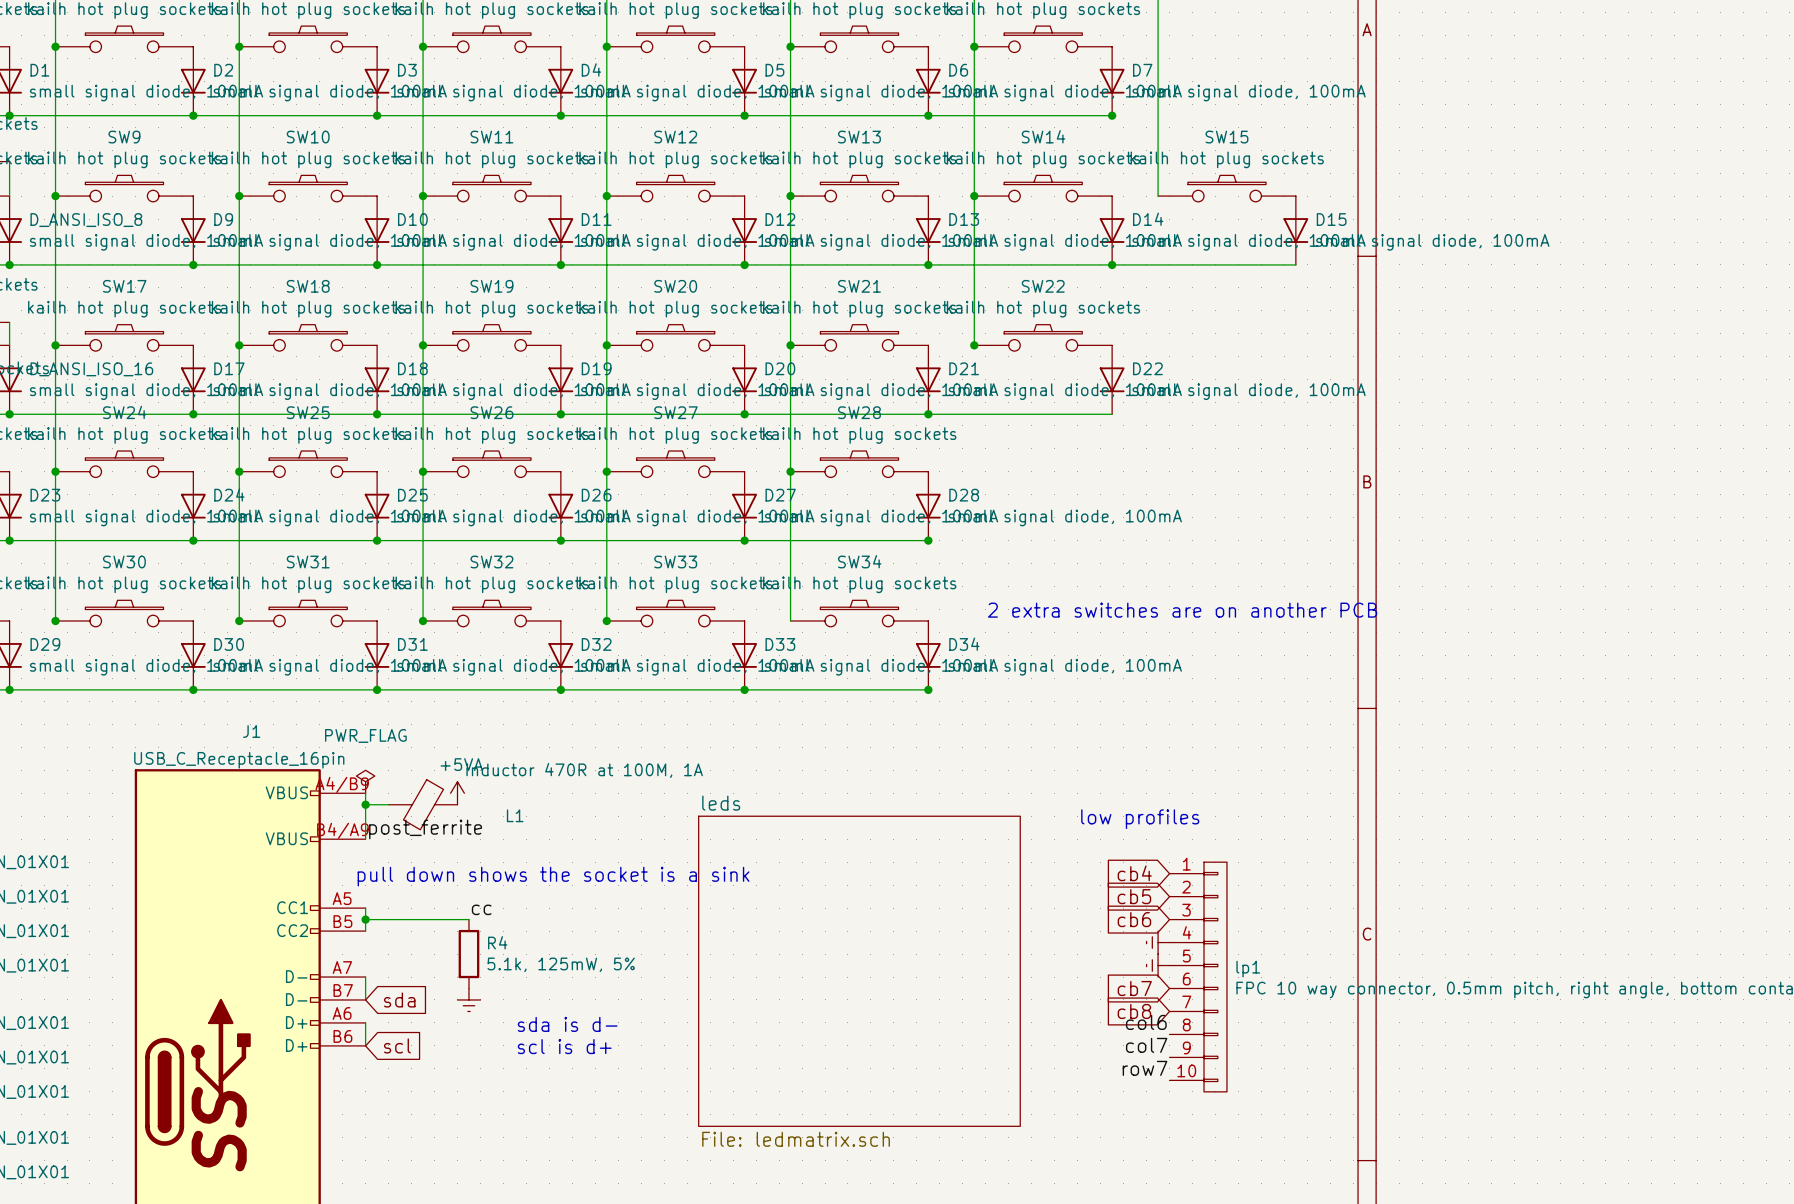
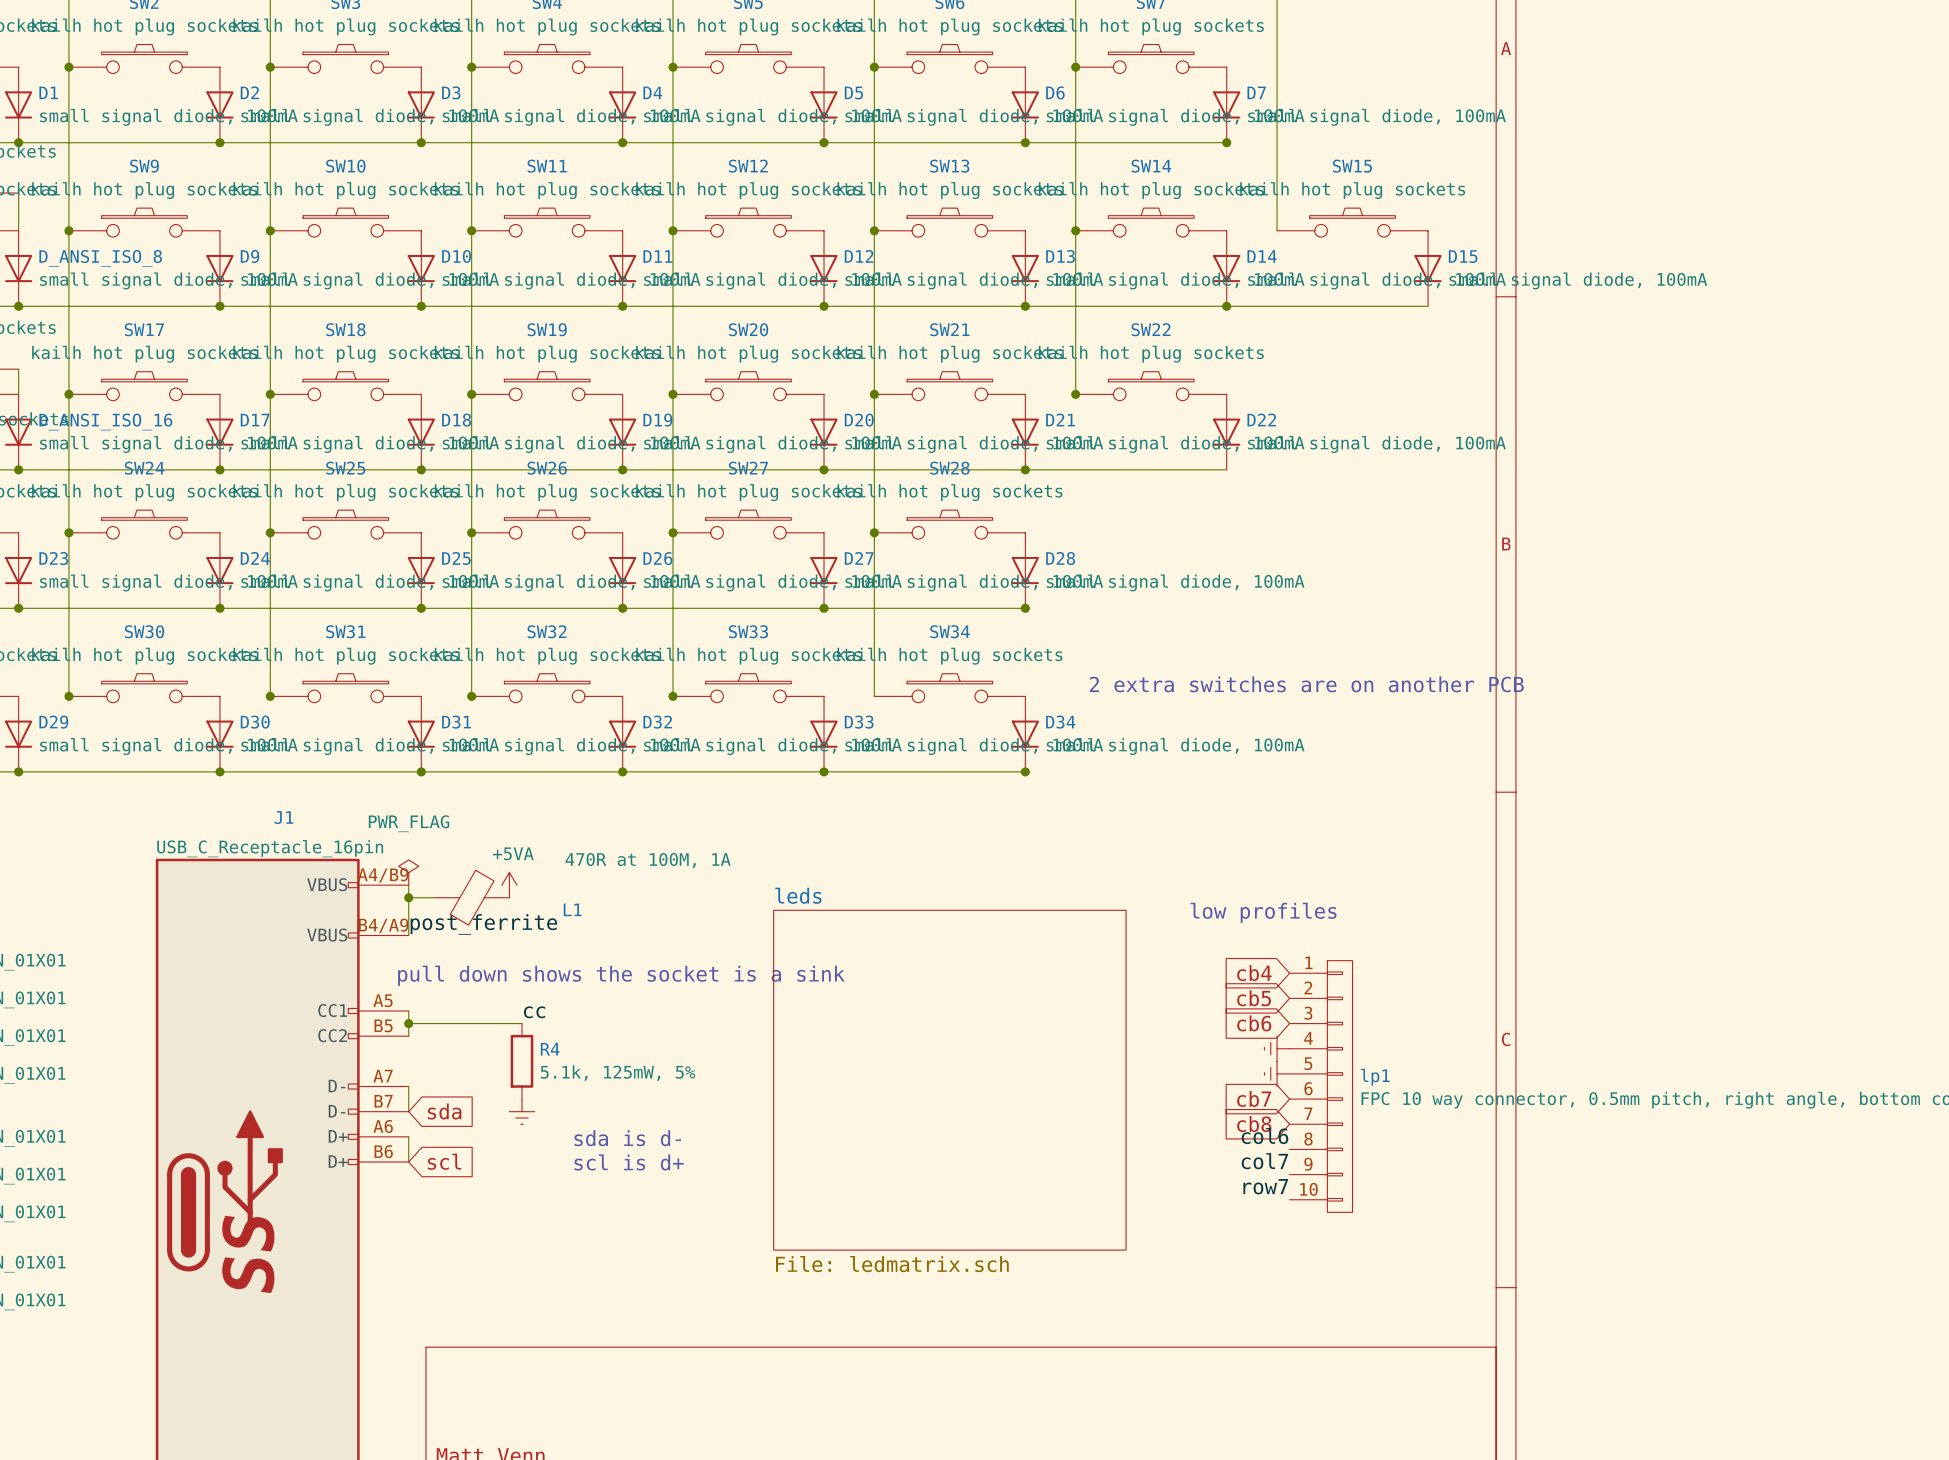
L1 value: inductor 470R at 100M, 1A (584, 770) -> 470R at 100M, 1A (648, 860)

